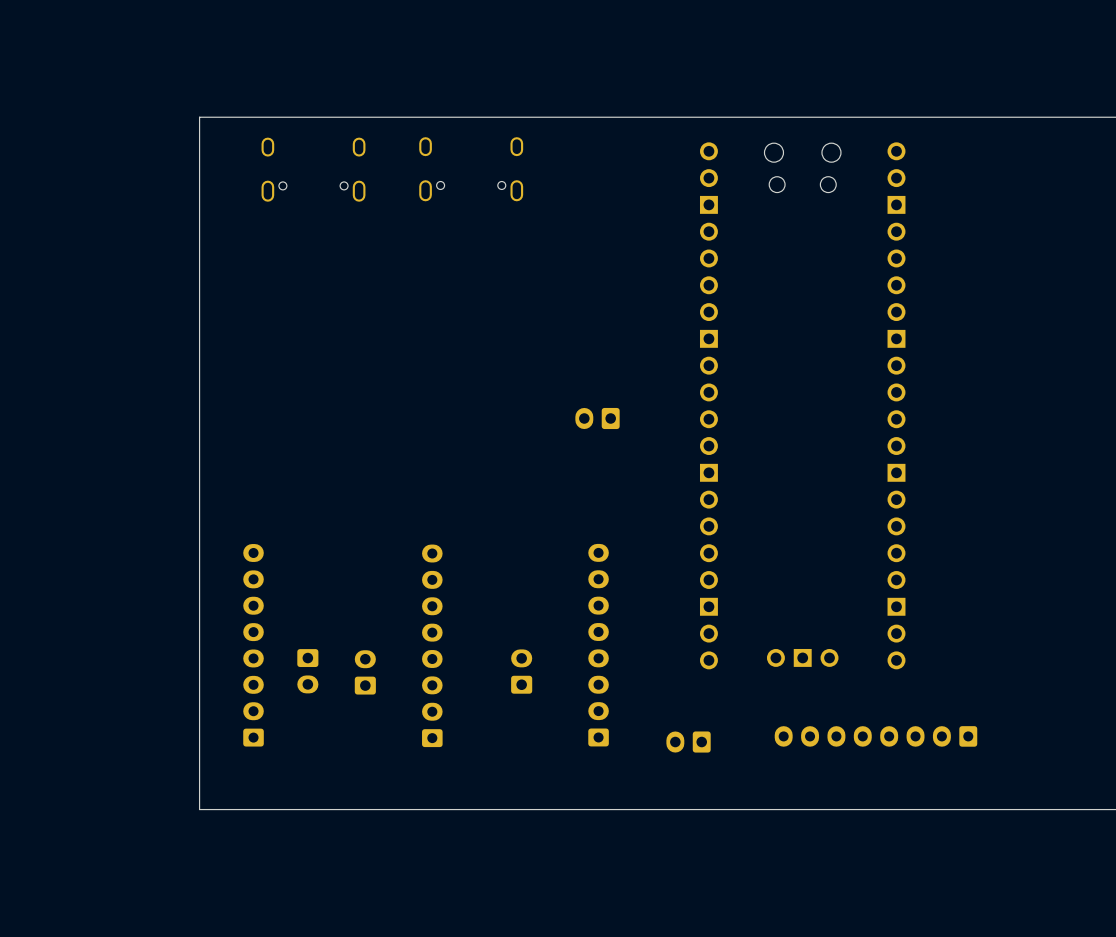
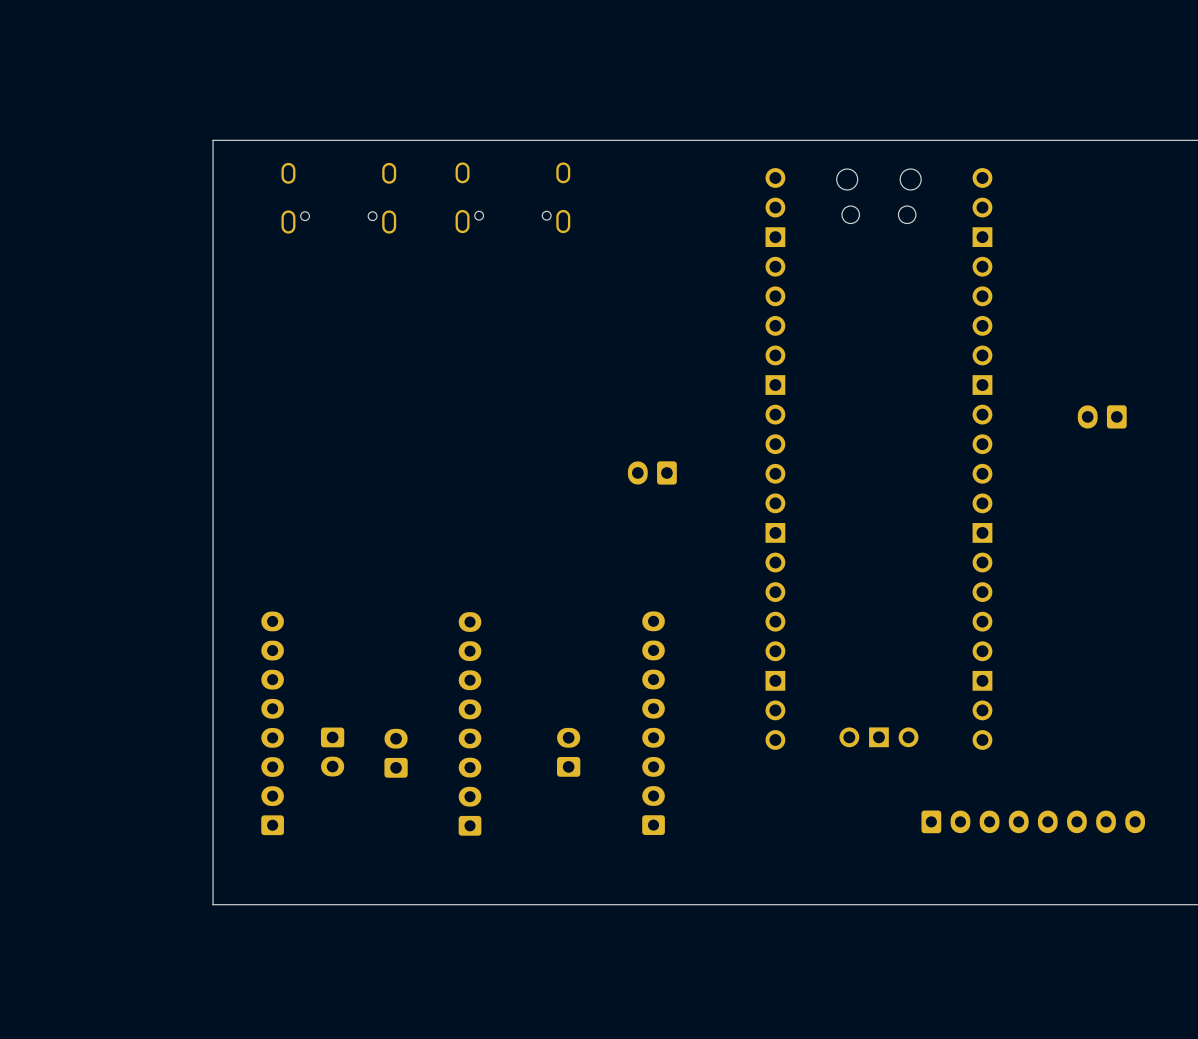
part: none -> (1102, 416)
part rotation: 0° (875, 736) -> 180° (1033, 821)
part: (688, 742) -> none

